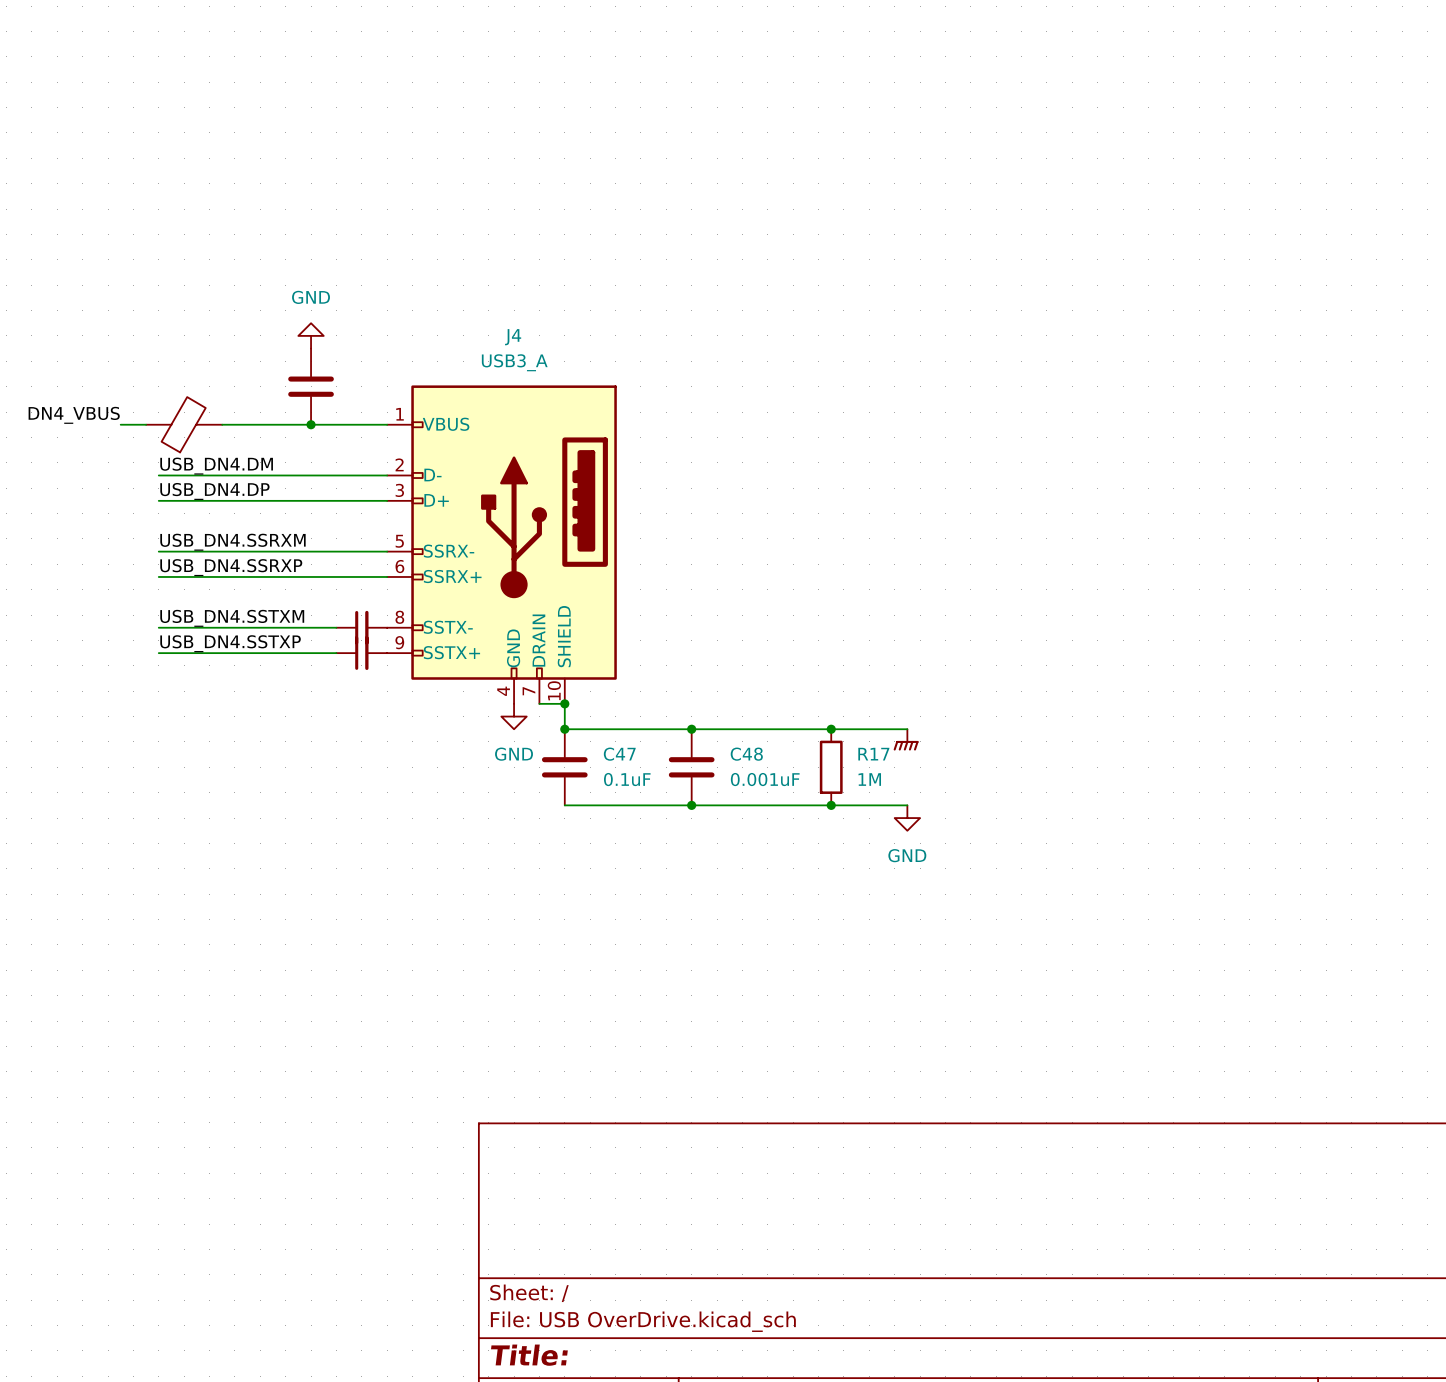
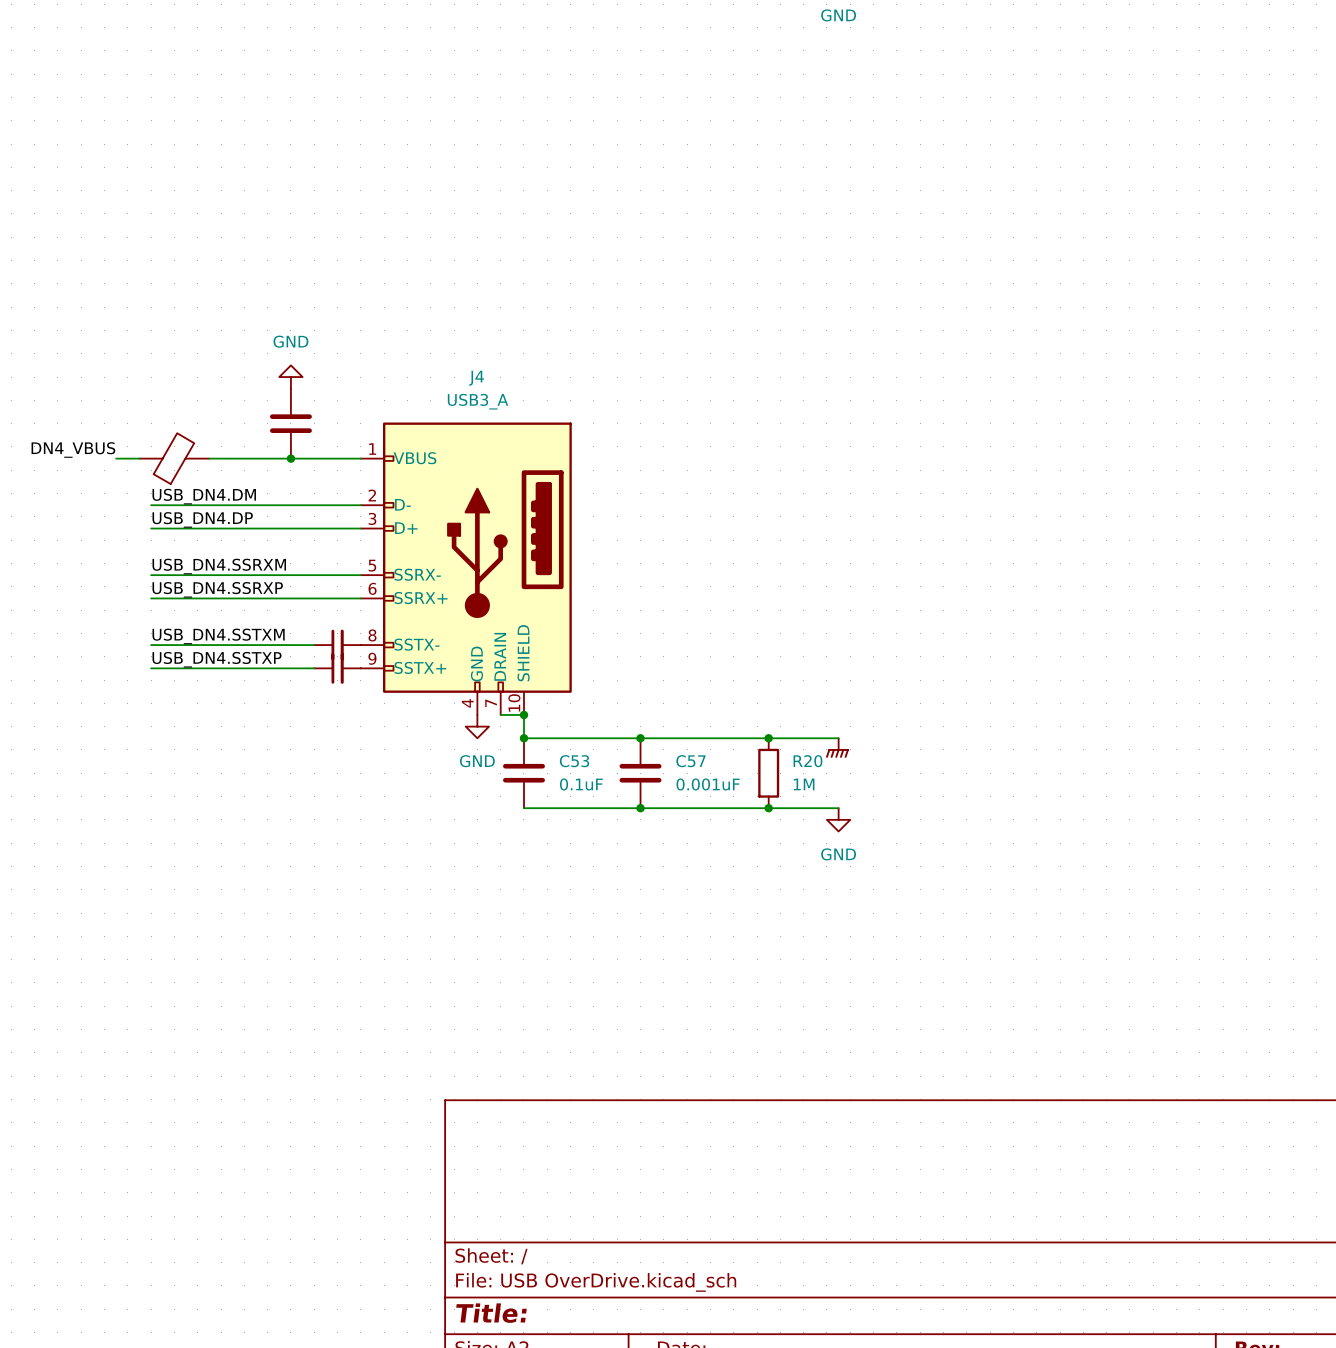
C47 name: C47 (619, 754) -> C53 (574, 761)
C48 name: C48 (746, 754) -> C57 (690, 761)
R17 name: R17 (873, 754) -> R20 (807, 761)

